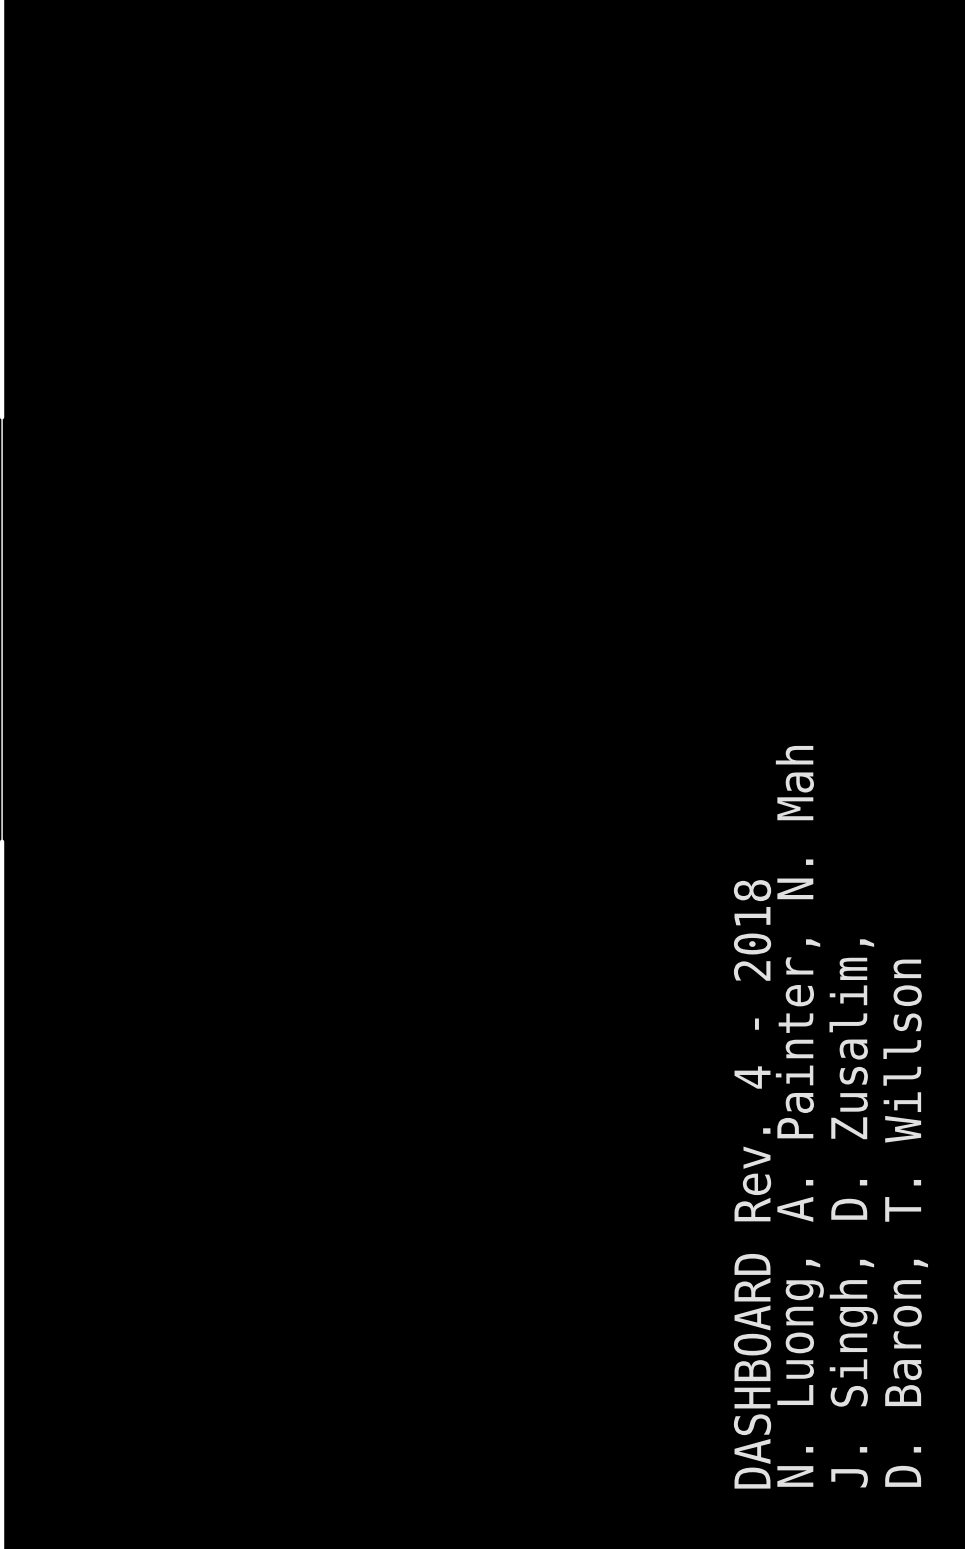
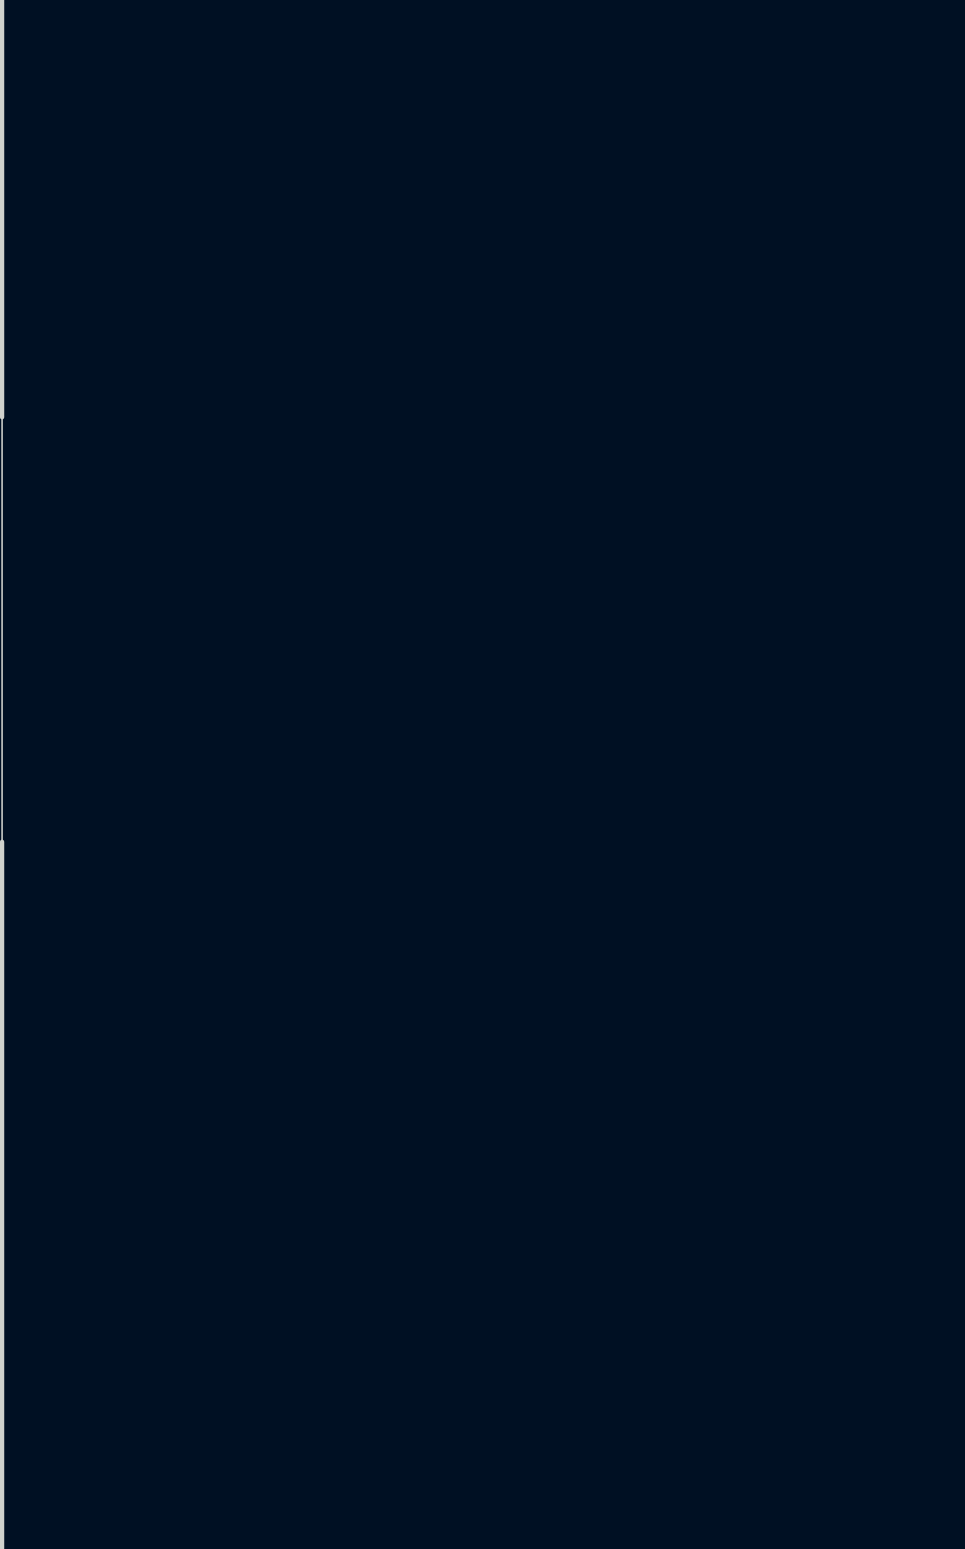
text: N. Luong, A. Painter, N. Mah (799, 1116) -> none
text: DASHBOARD Rev. 4 - 2018 (752, 1184) -> none
text: J. Singh, D. Zusalim, (853, 1213) -> none
text: D. Baron, T. Willson (905, 1223) -> none

